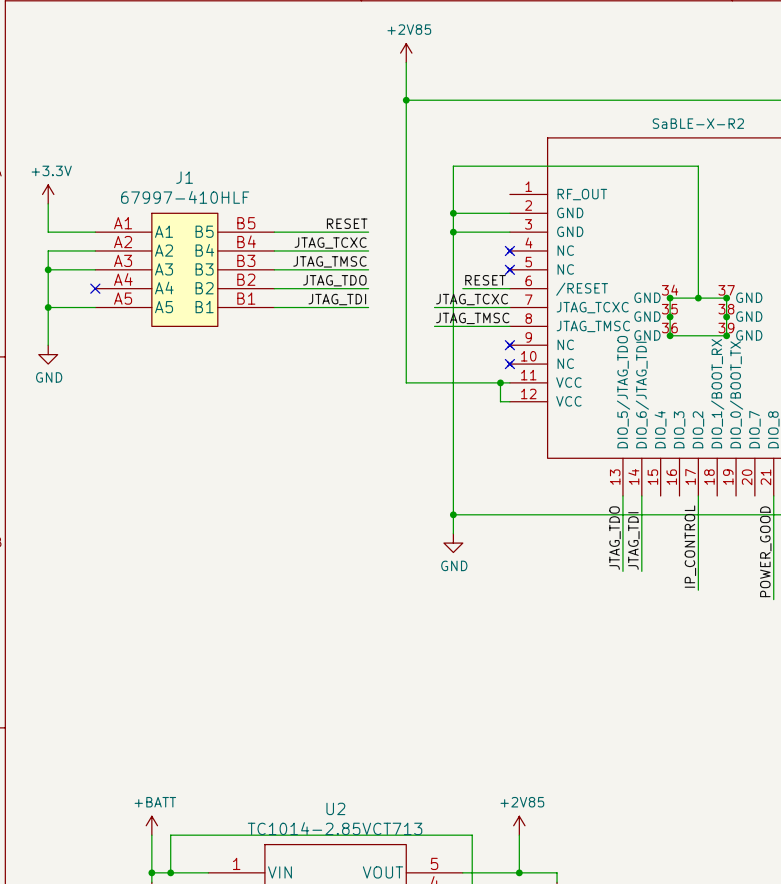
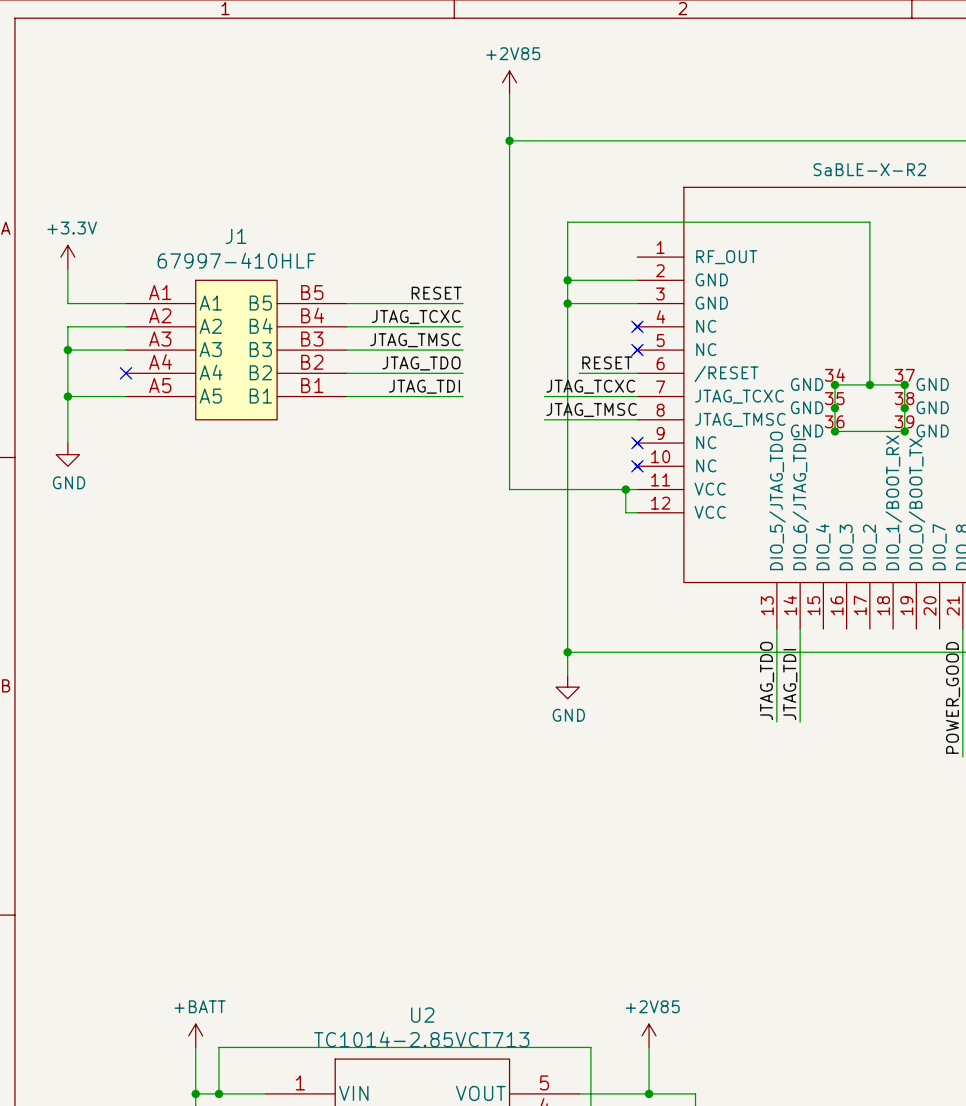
wire: (698, 495) (698, 590) -> none
label: IP_CONTROL (690, 546) -> none

